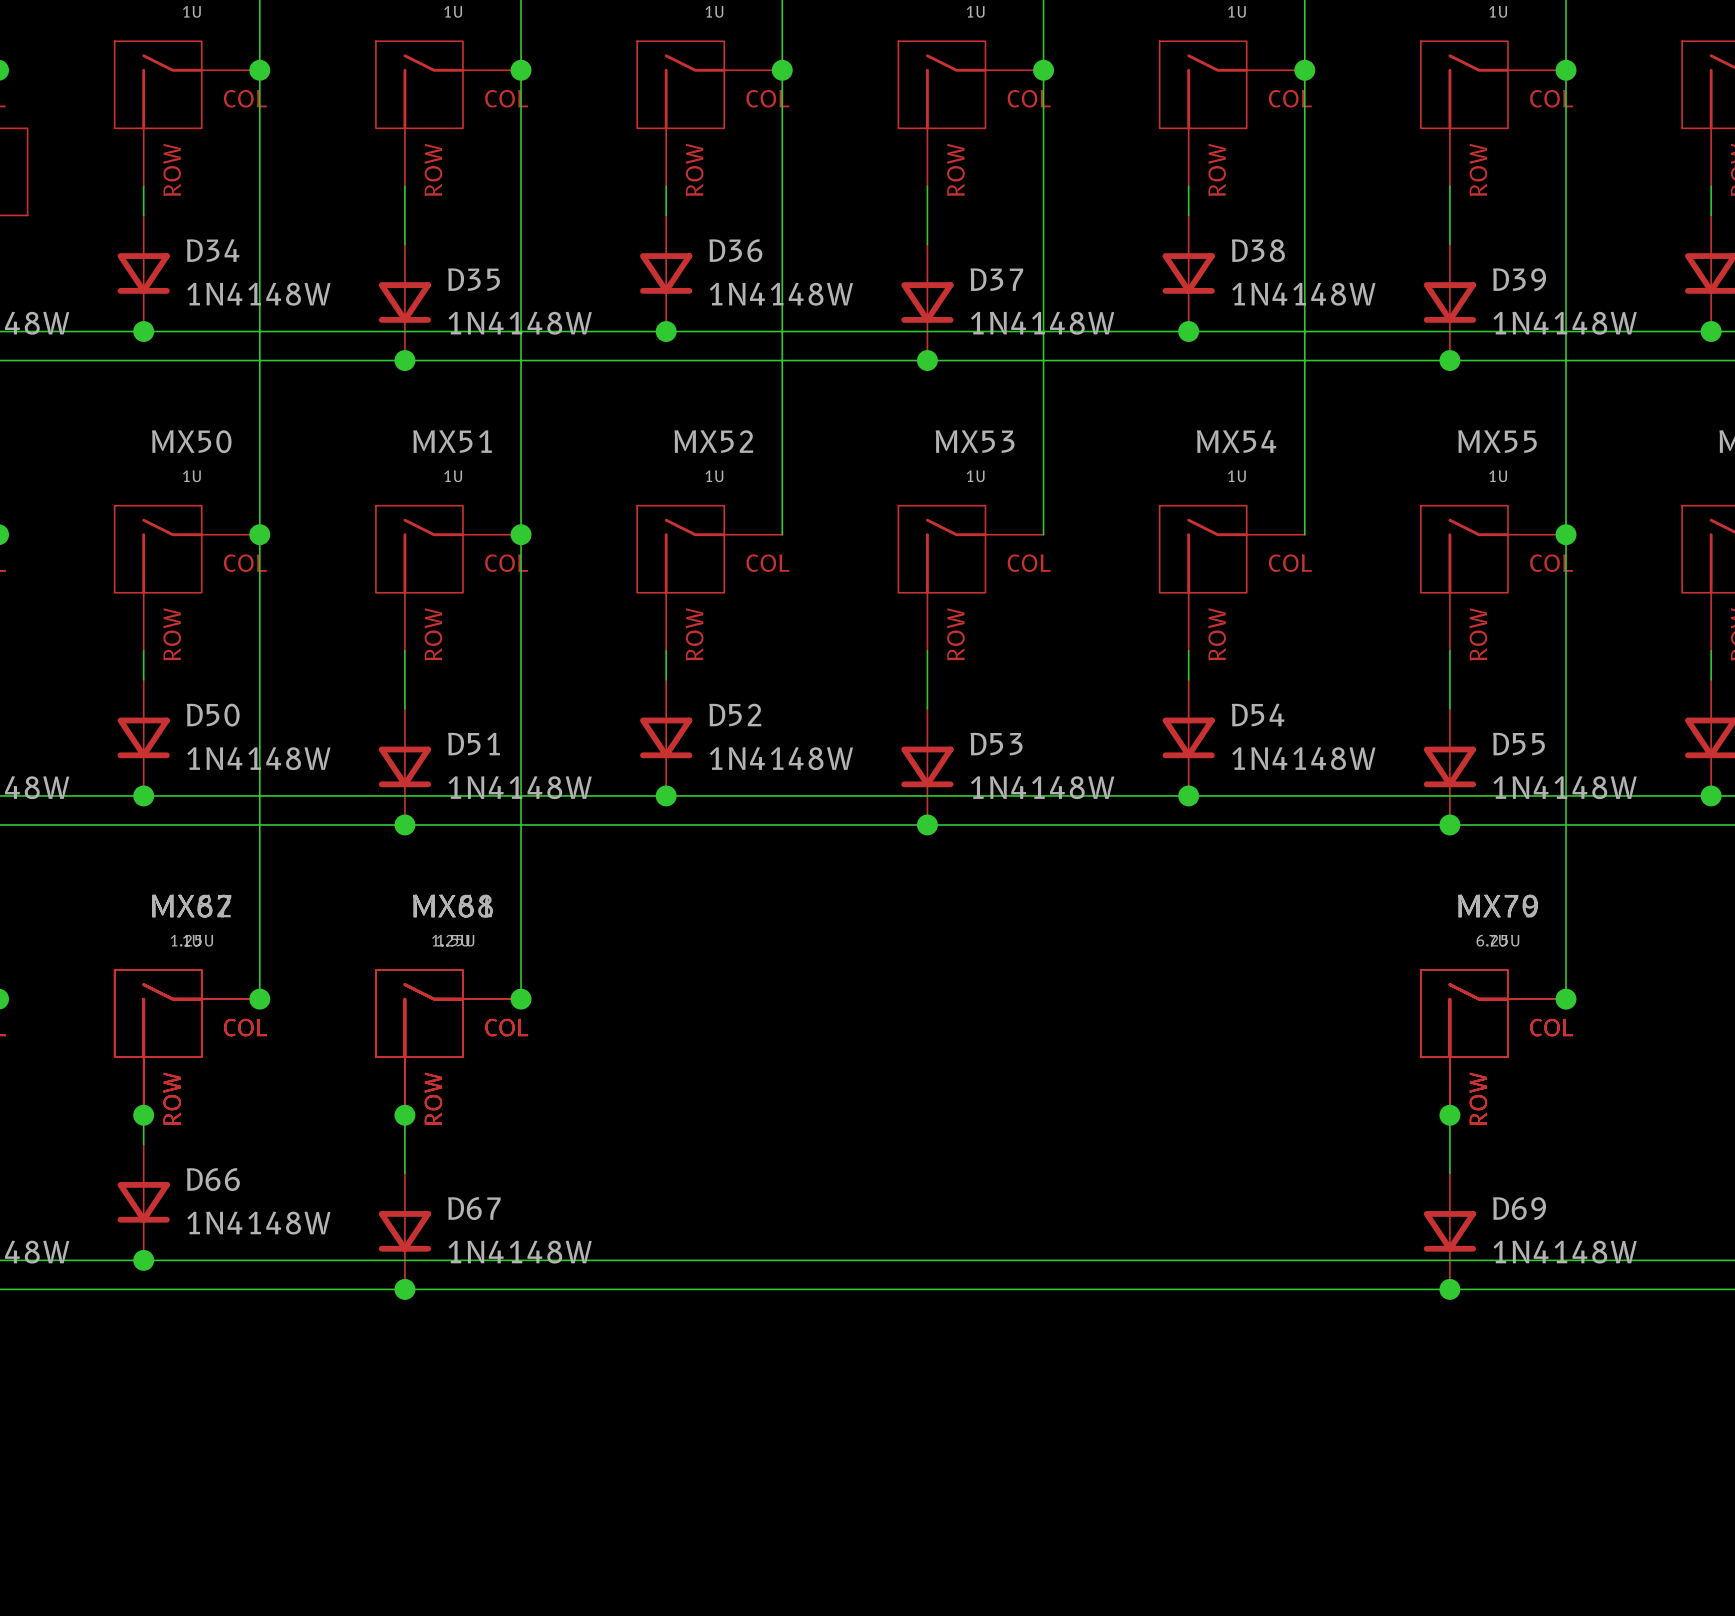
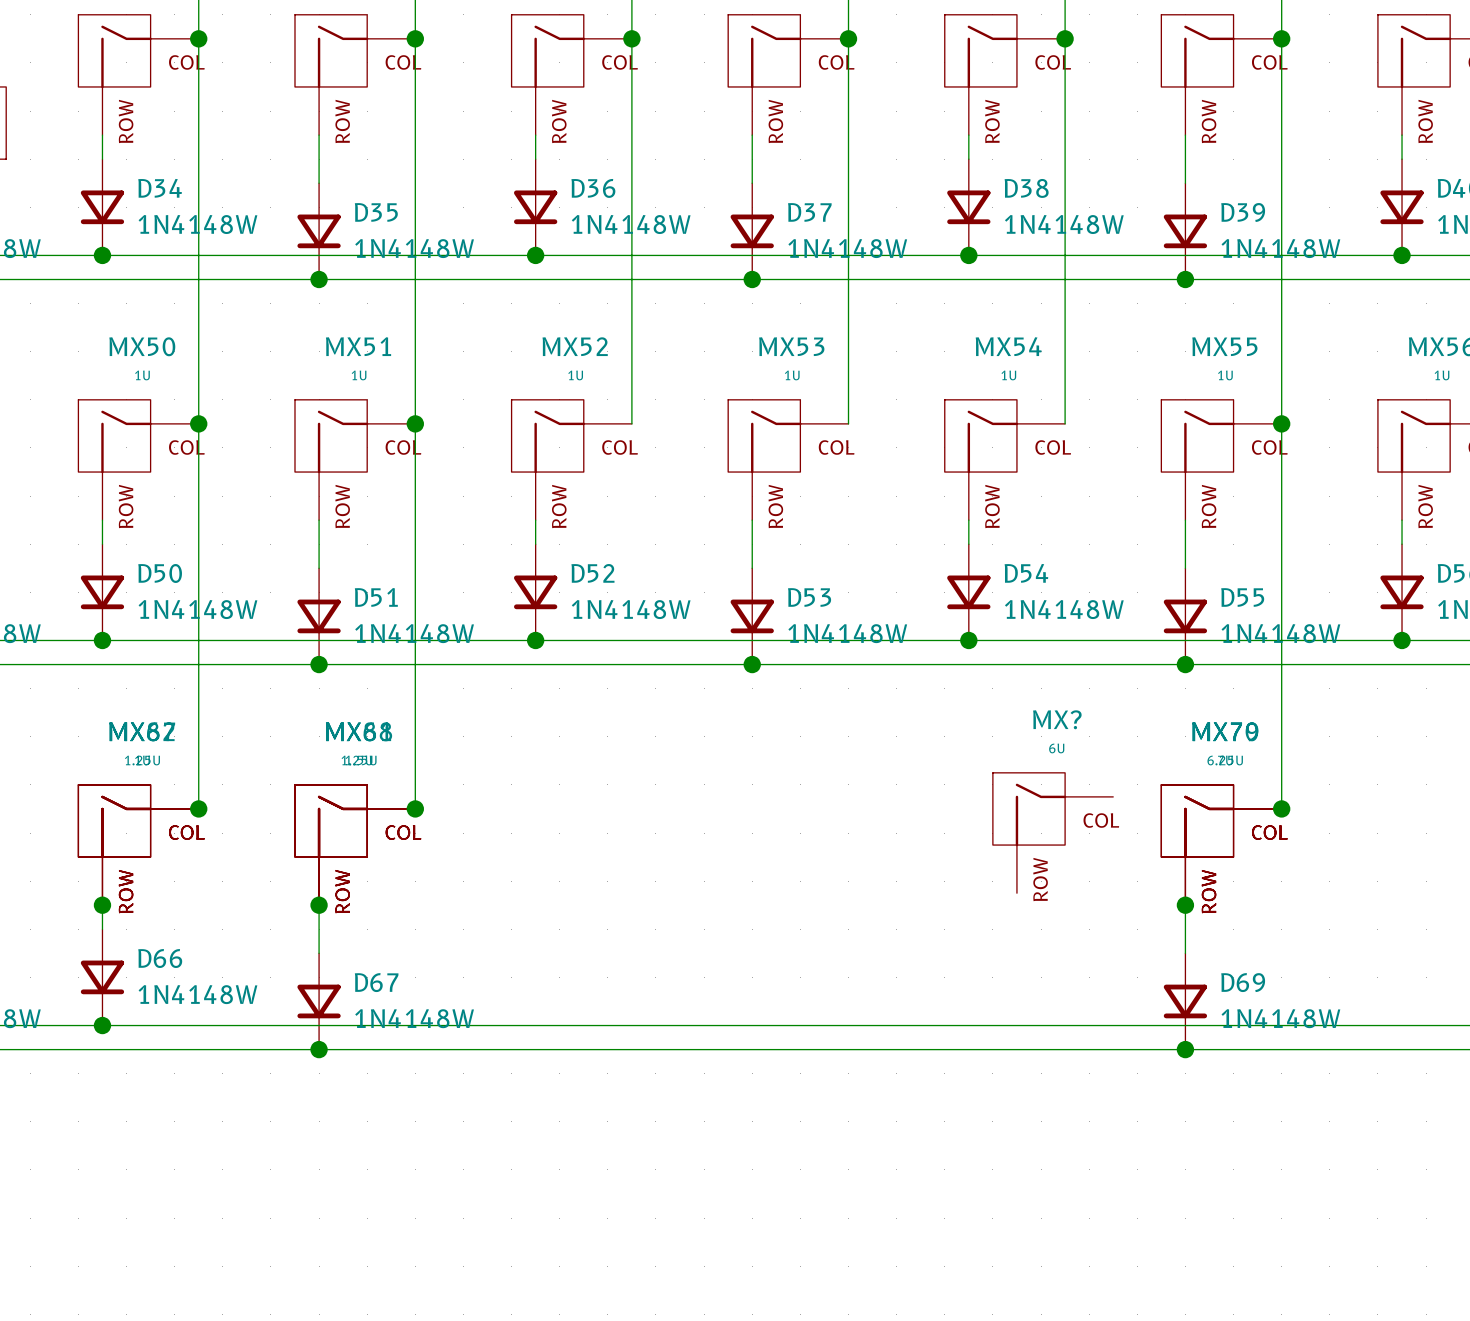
MX?: none -> 6U (1053, 833)

